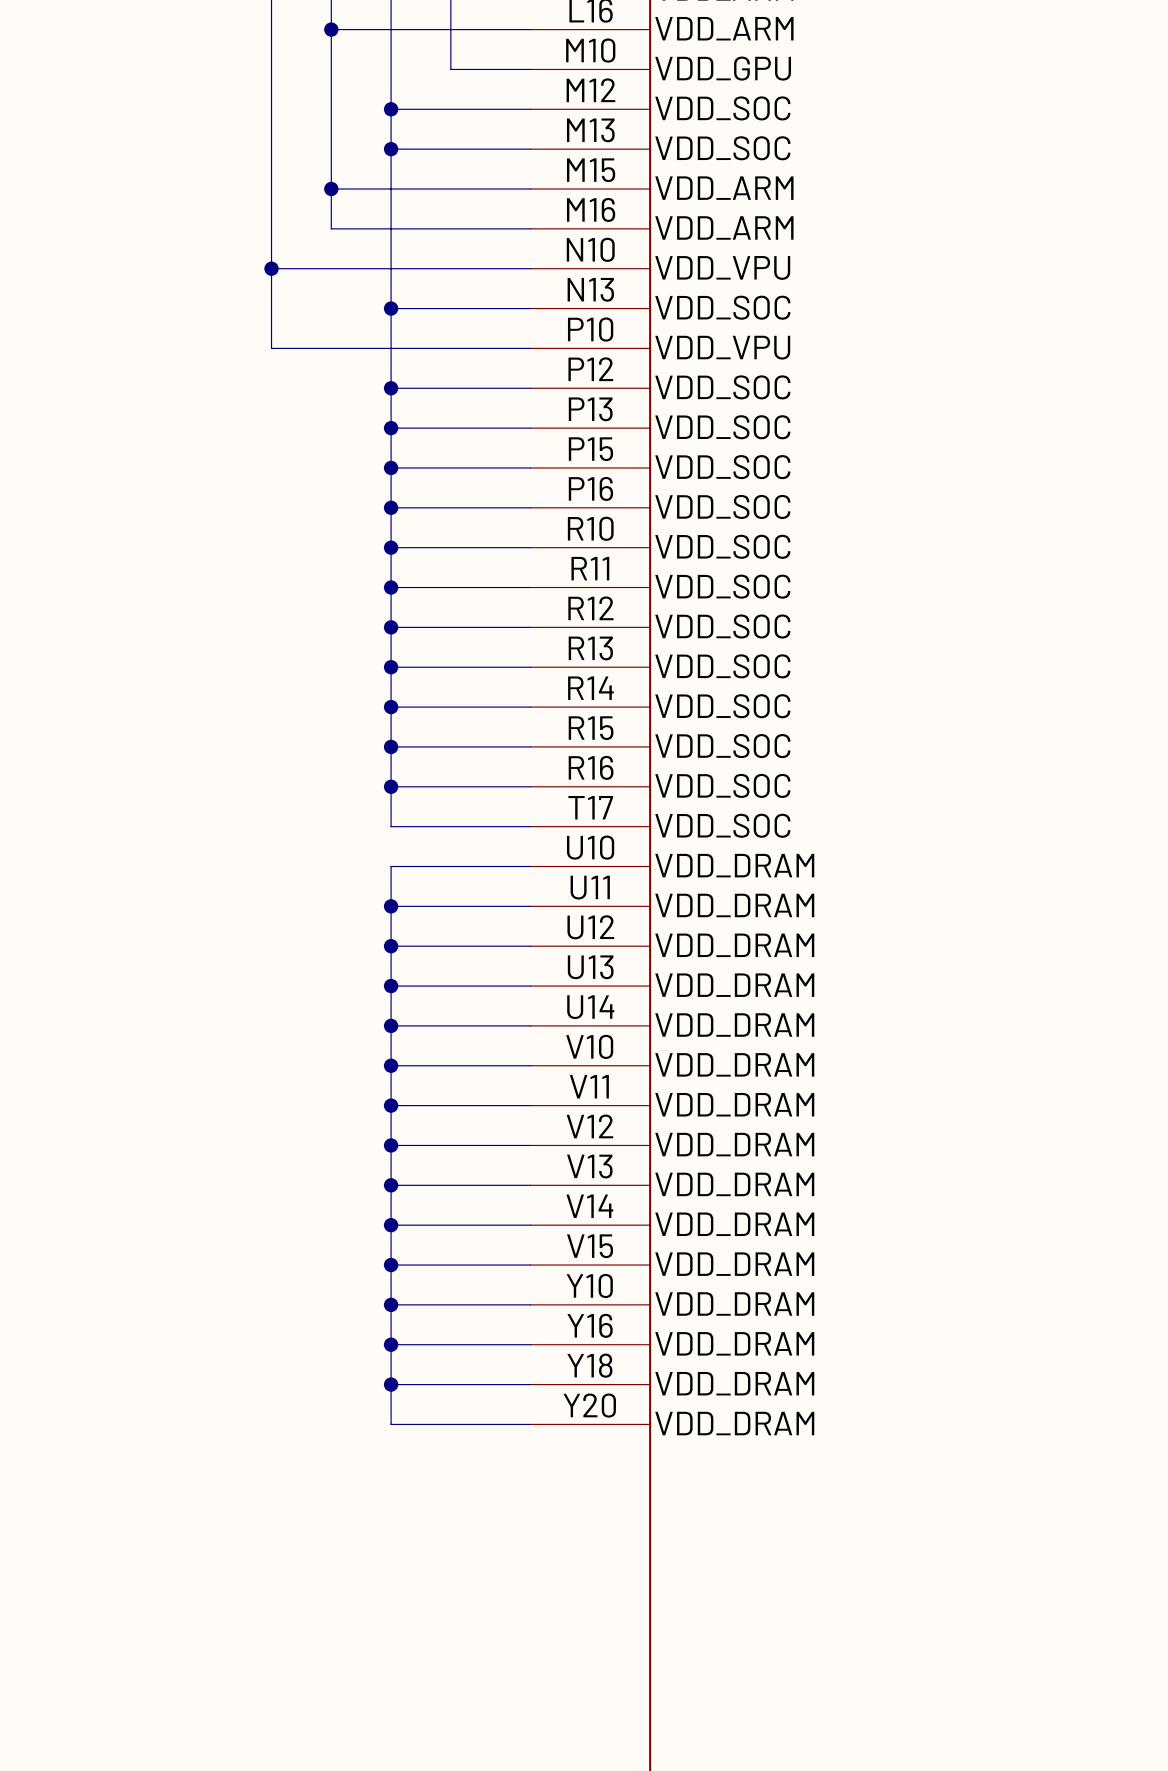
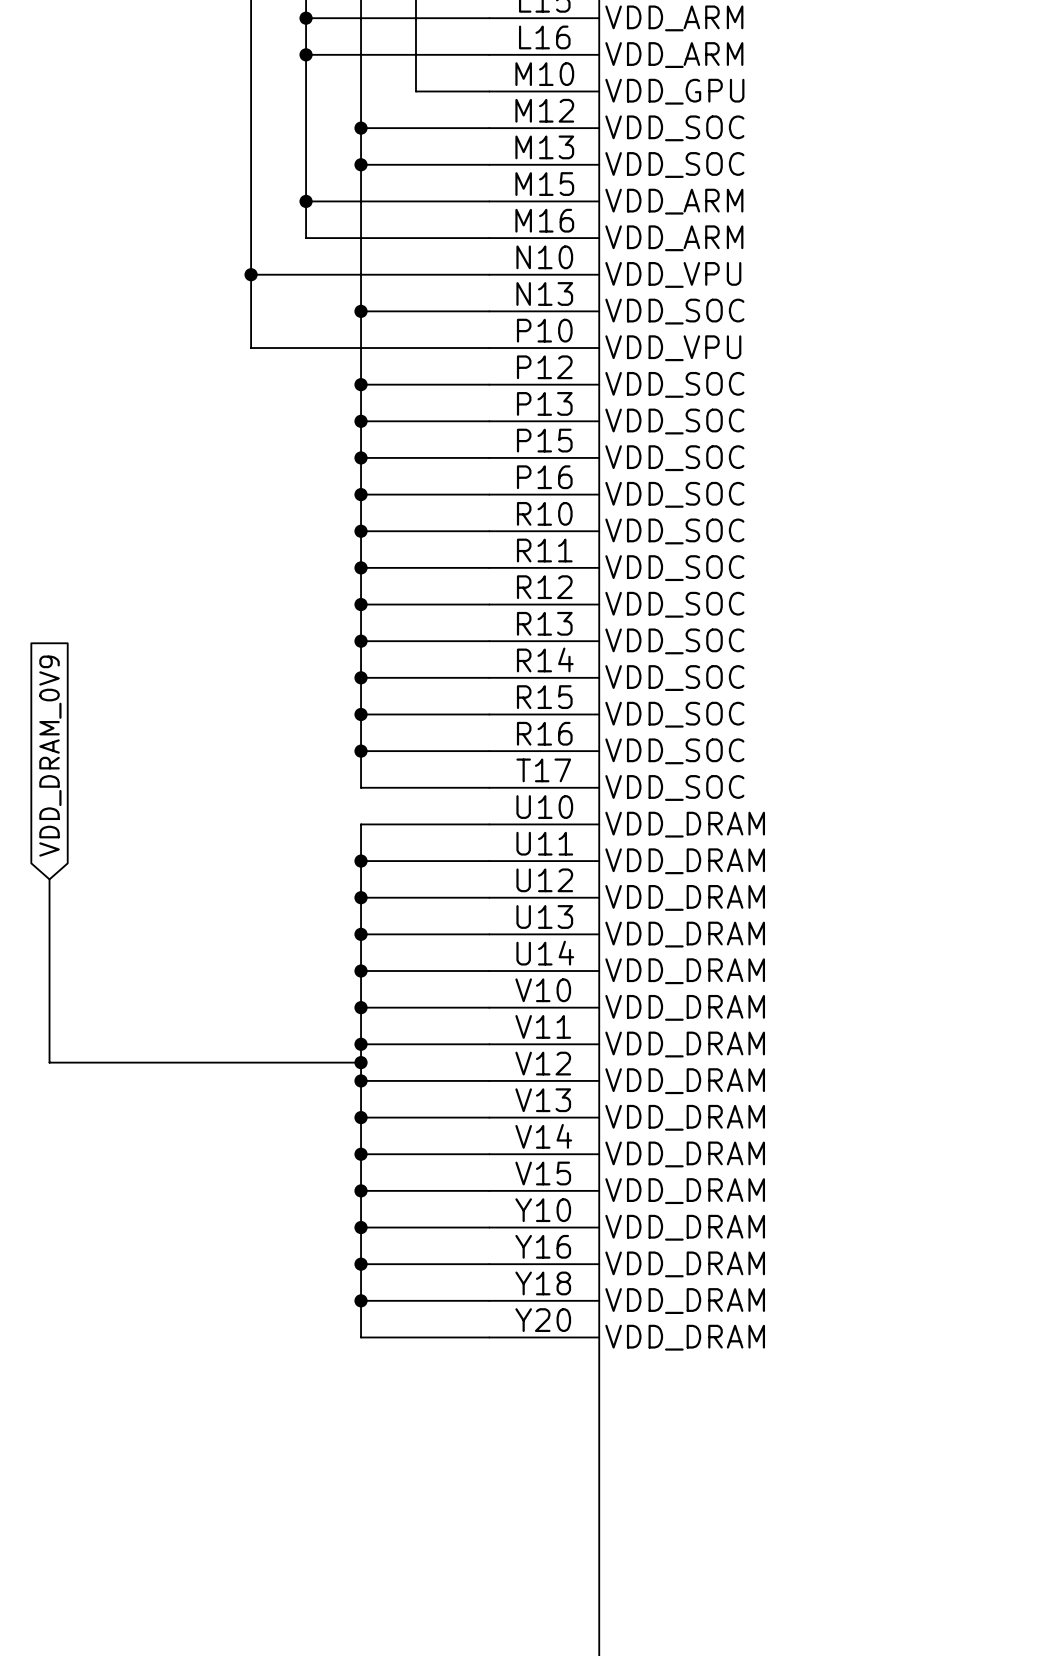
global label: none -> VDD_DRAM_0V9 (50, 756)
wire: none -> (49, 879) (49, 1062) (361, 1062)
junction: none -> (361, 1062)

